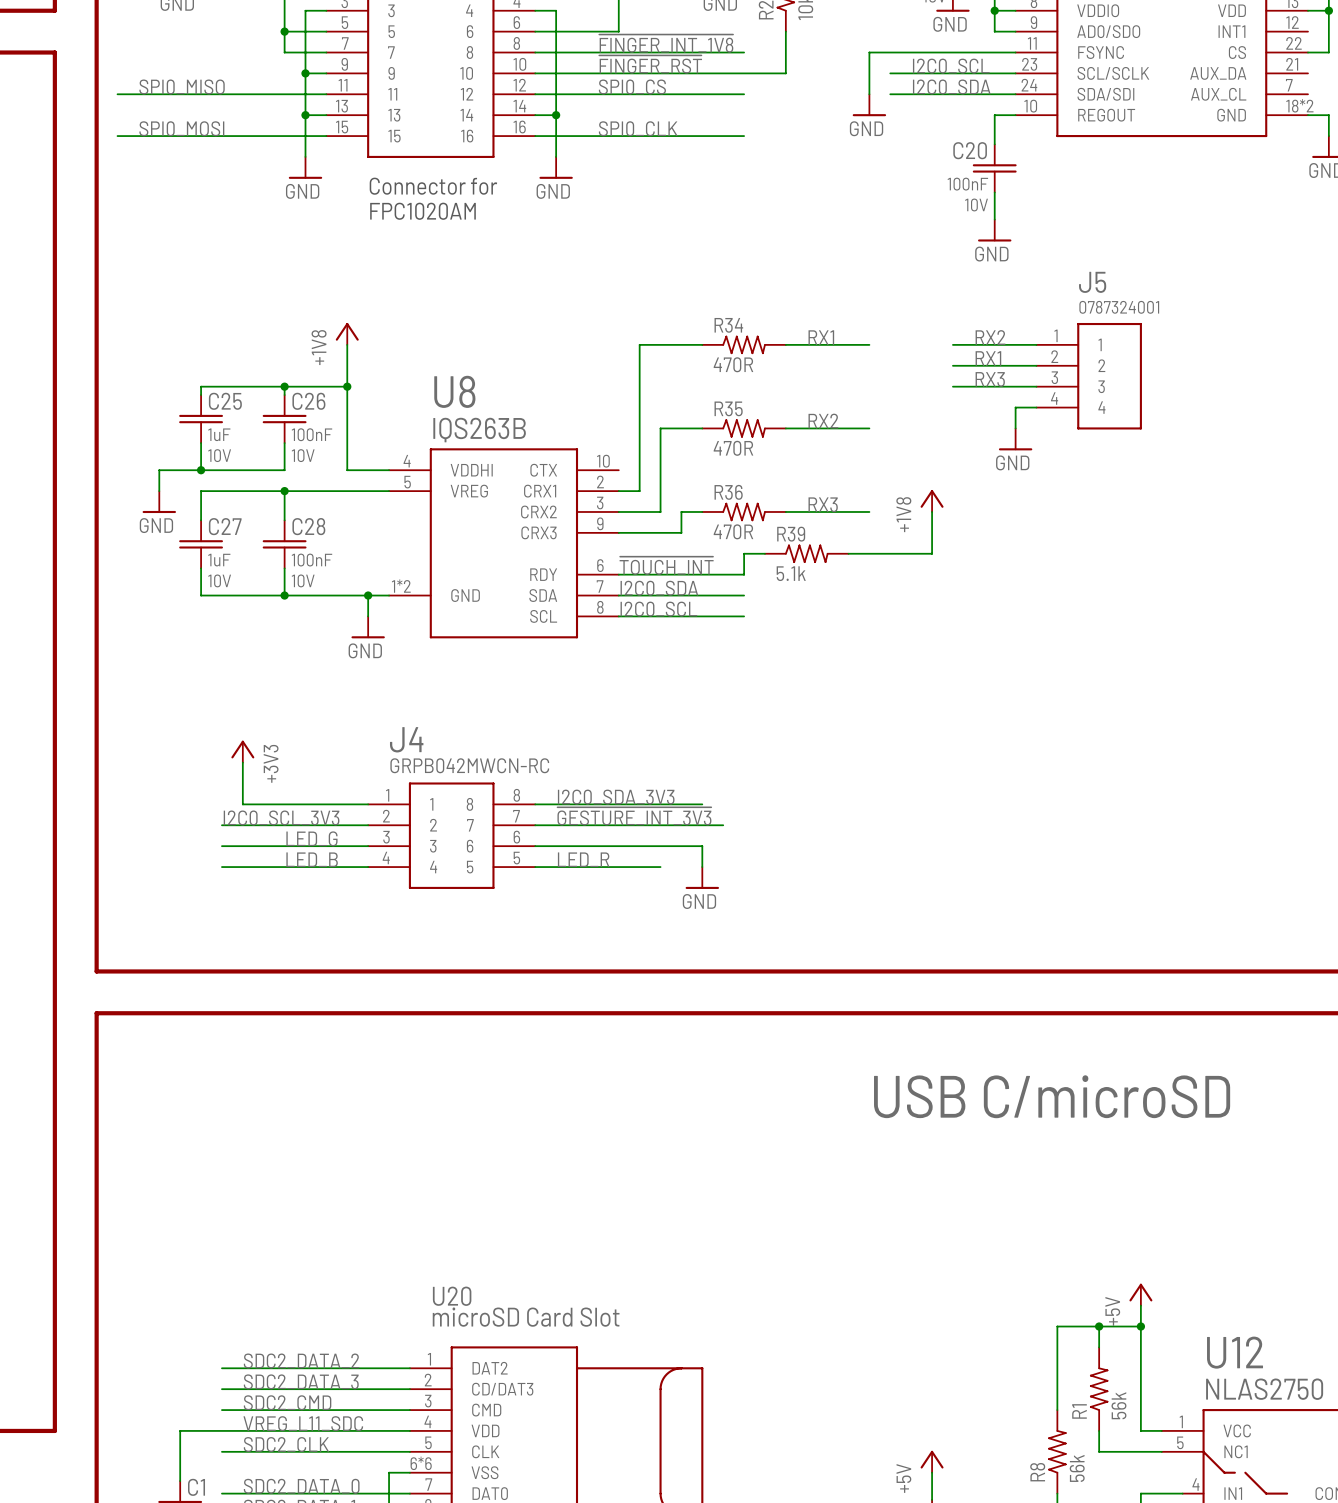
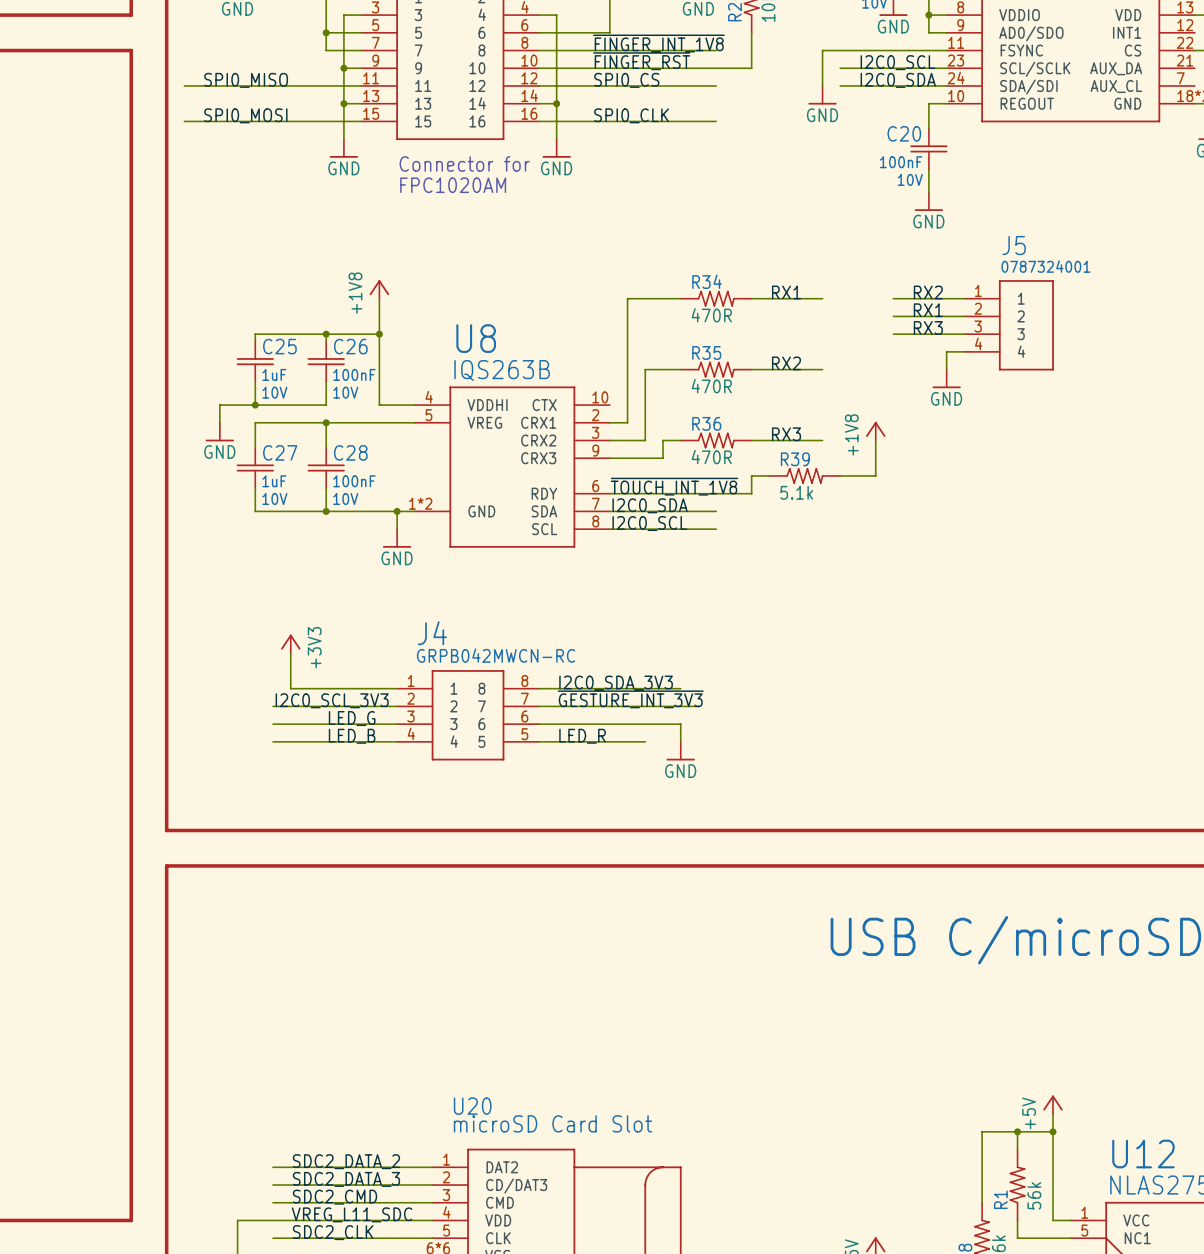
wire: (764, 553) (744, 553) (744, 574) -> (769, 475) (751, 475) (751, 493) (716, 493)
R39 position: (806, 553) -> (804, 475)
label: ~{TOUCH_INT} (666, 565) -> ~{TOUCH_INT_1V8} (674, 486)

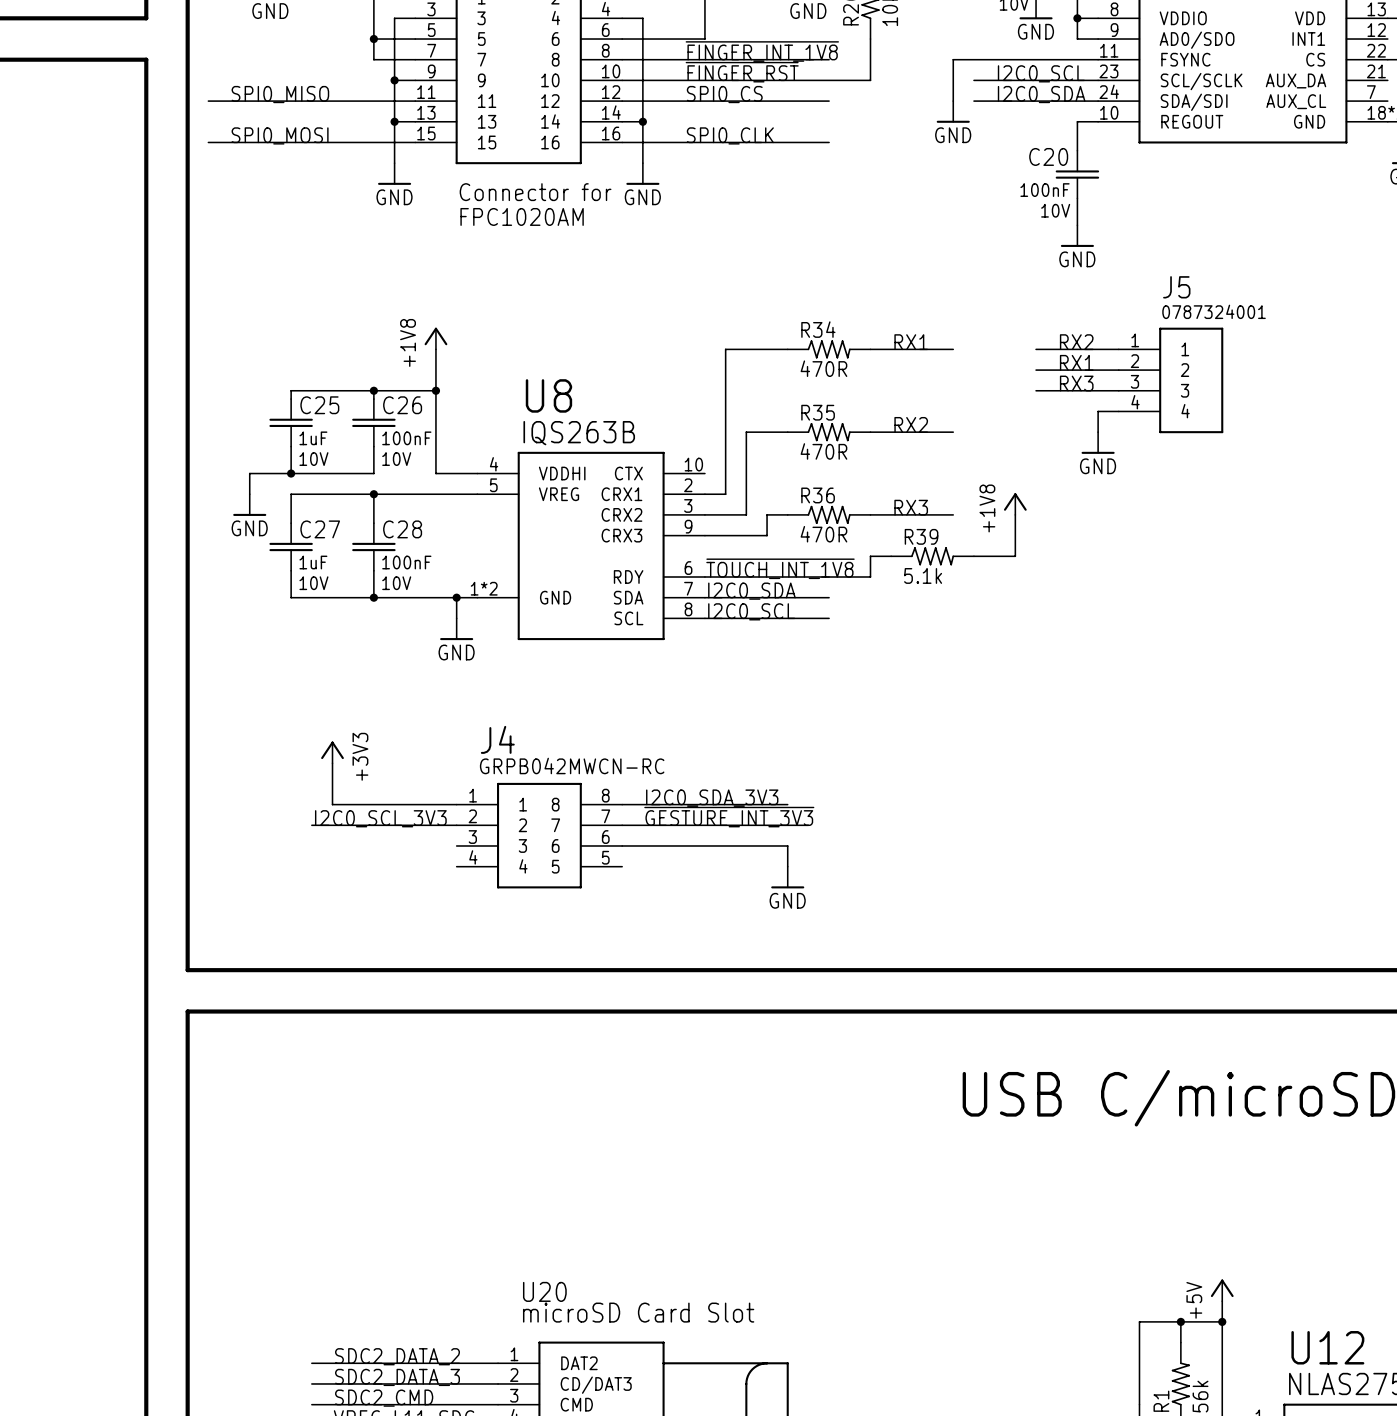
label: LED_G (352, 718) -> none
wire: (273, 724) (397, 724) -> none
label: LED_B (352, 736) -> none
label: LED_R (582, 736) -> none
wire: (273, 741) (397, 741) -> none
wire: (538, 741) (645, 741) -> none

